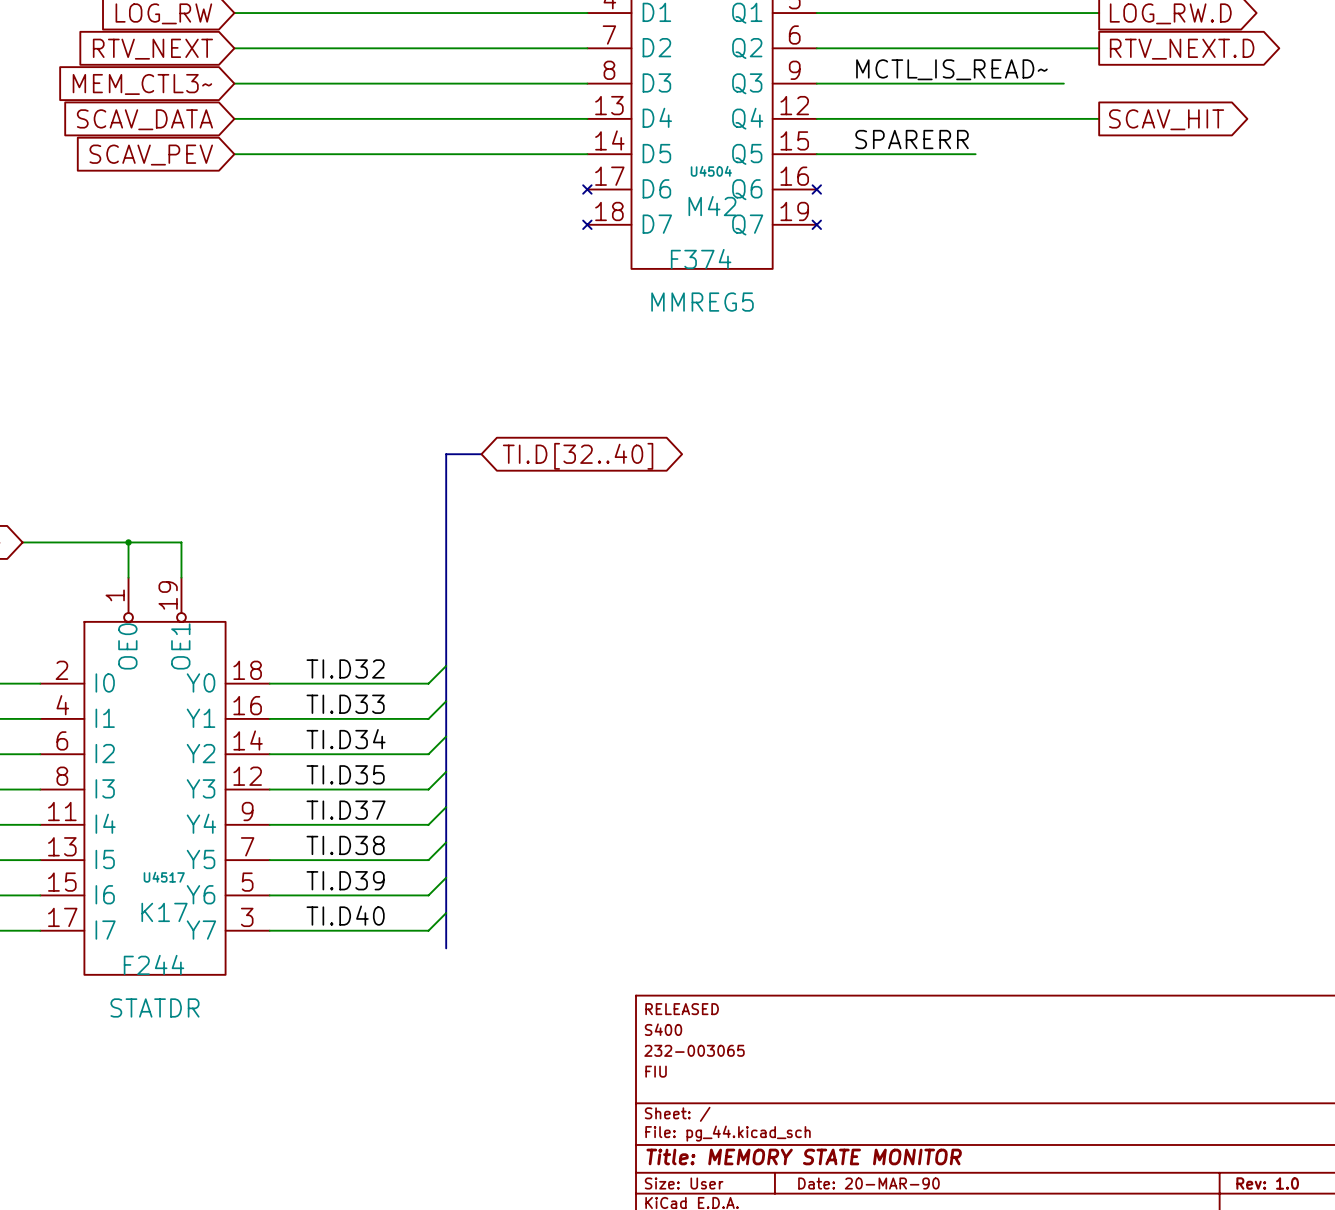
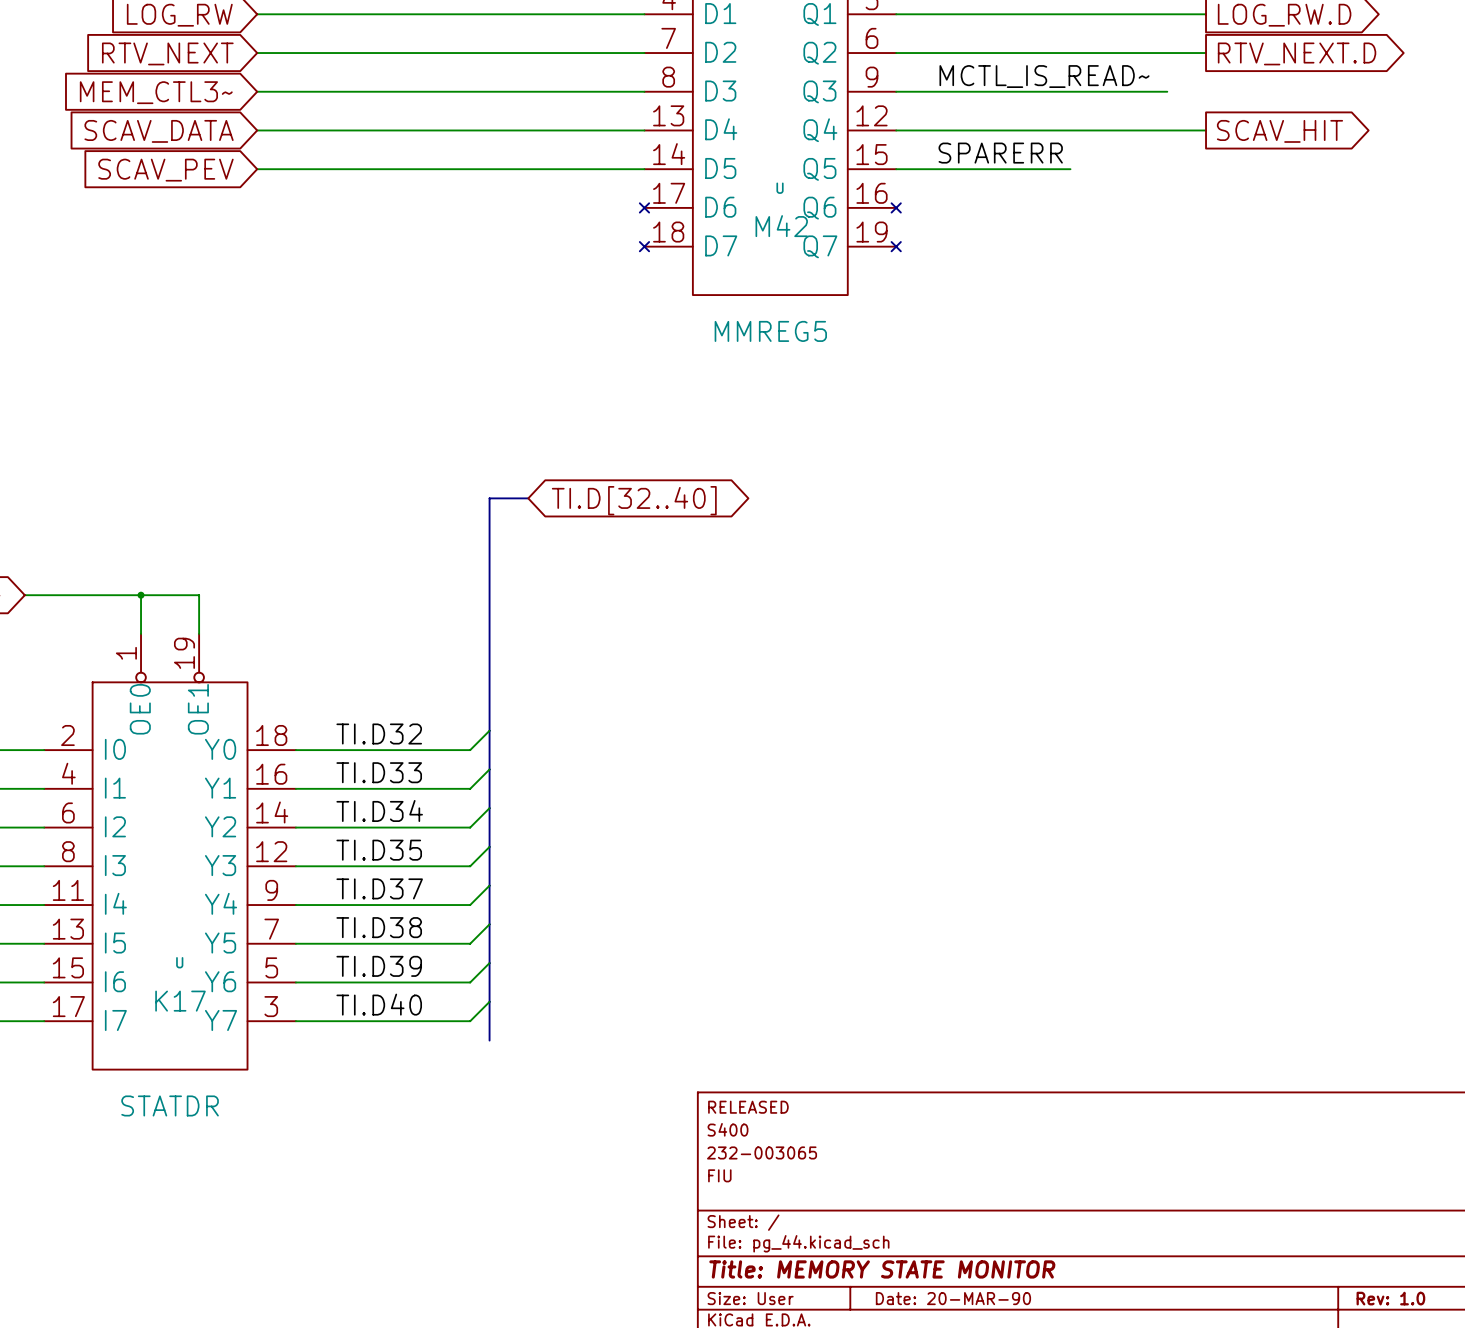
U4504 name: U4504 (711, 171) -> U (780, 188)
U4504 value: F374 (701, 259) -> none
U4517 name: U4517 (164, 877) -> U (179, 962)
U4517 value: F244 (154, 964) -> none

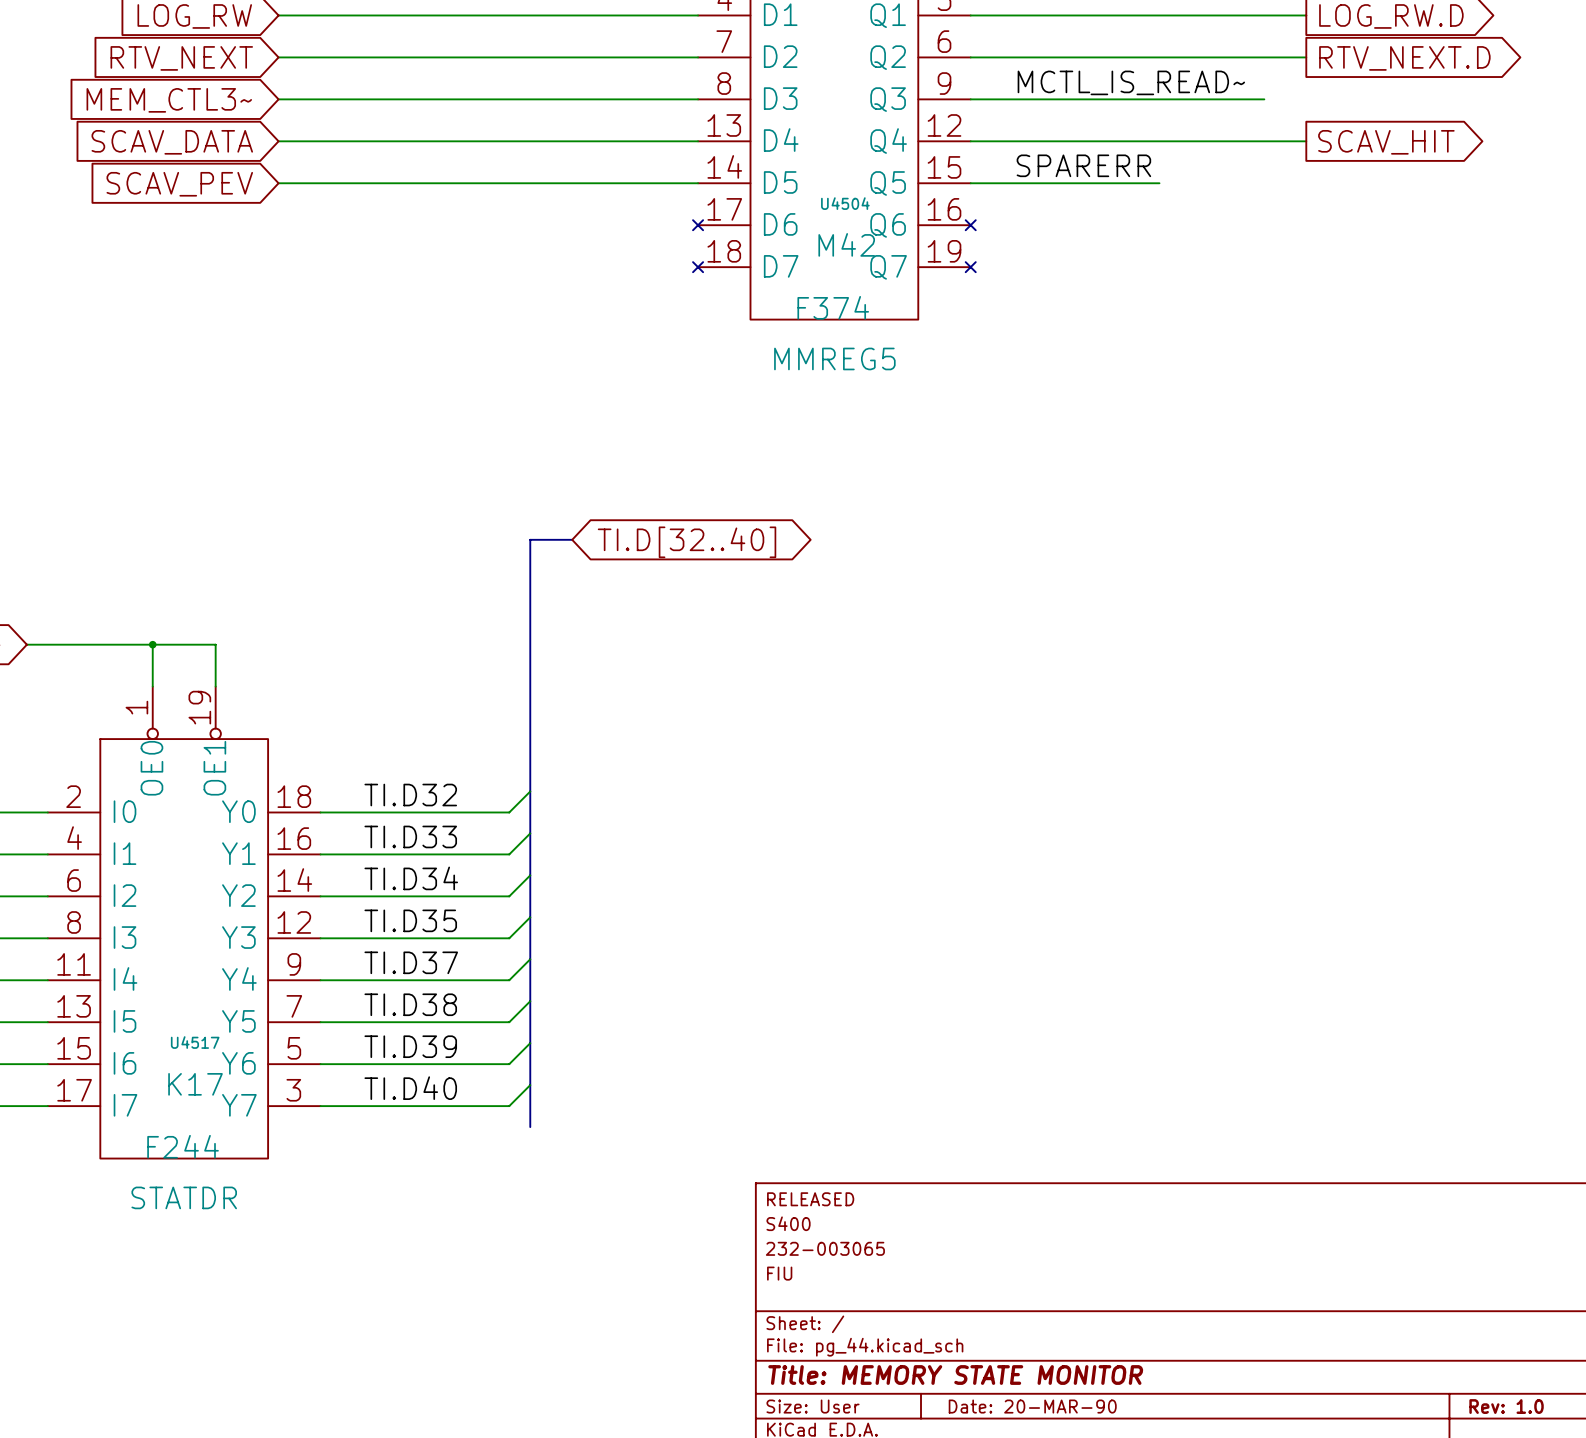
U name: U (780, 188) -> U4504 (845, 203)
U value: none -> F374 (833, 307)
U name: U (179, 962) -> U4517 (195, 1042)
U value: none -> F244 (183, 1146)

